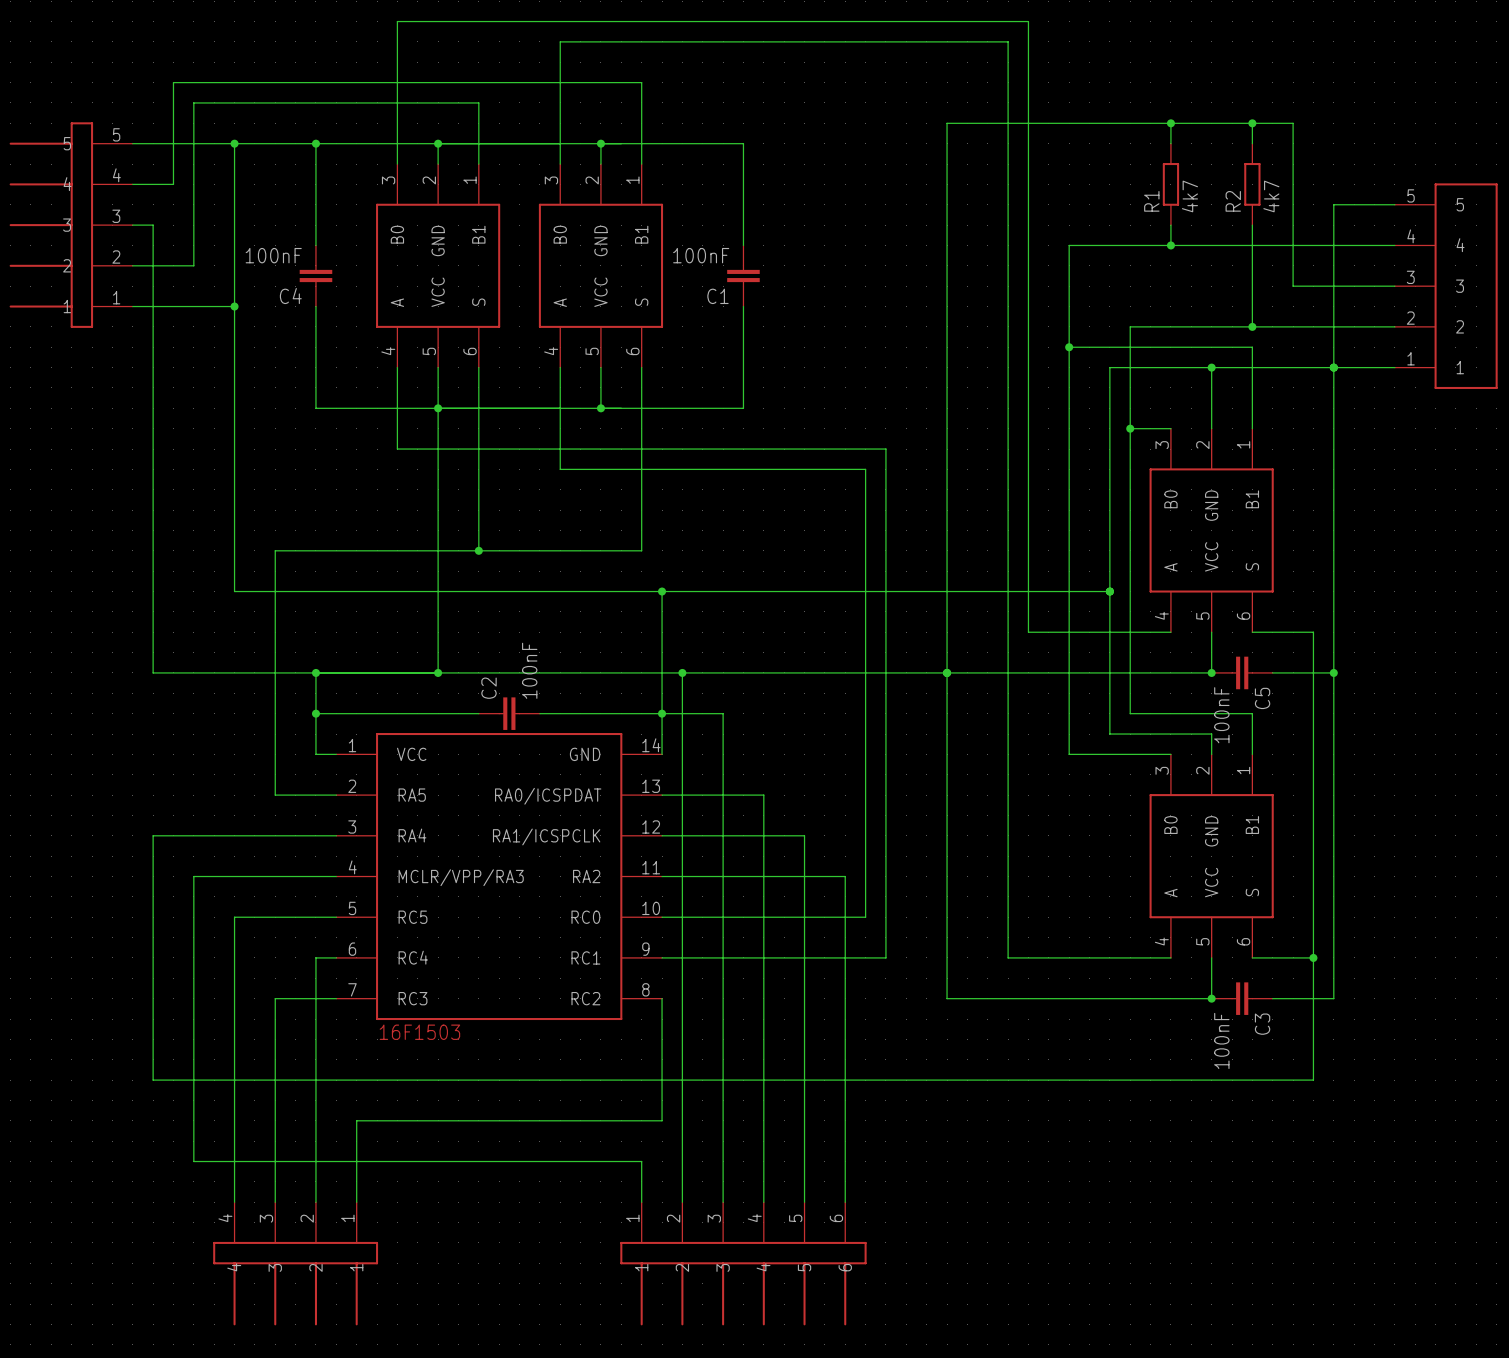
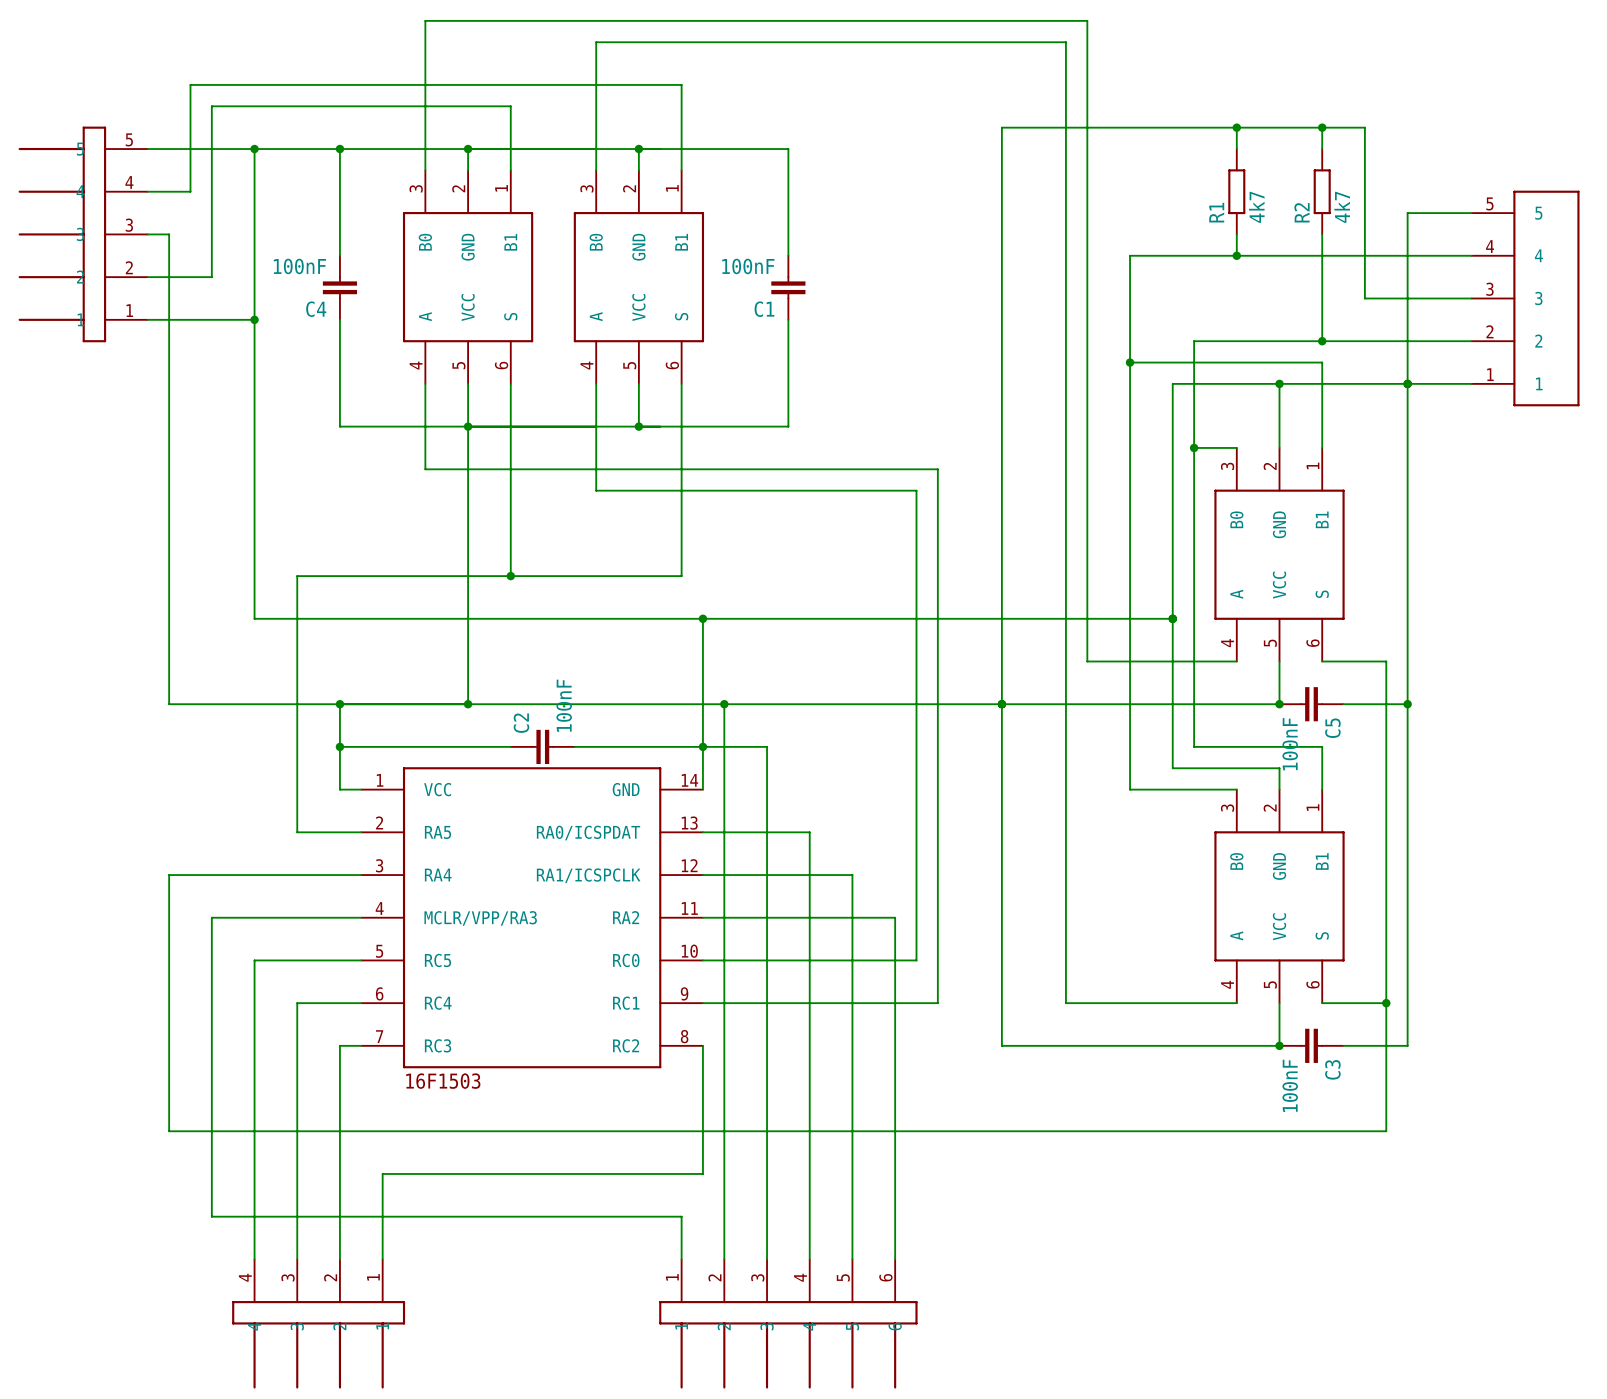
wire: (315, 957) (315, 998) (275, 998) -> (339, 1003) (297, 1003) (297, 1045)

